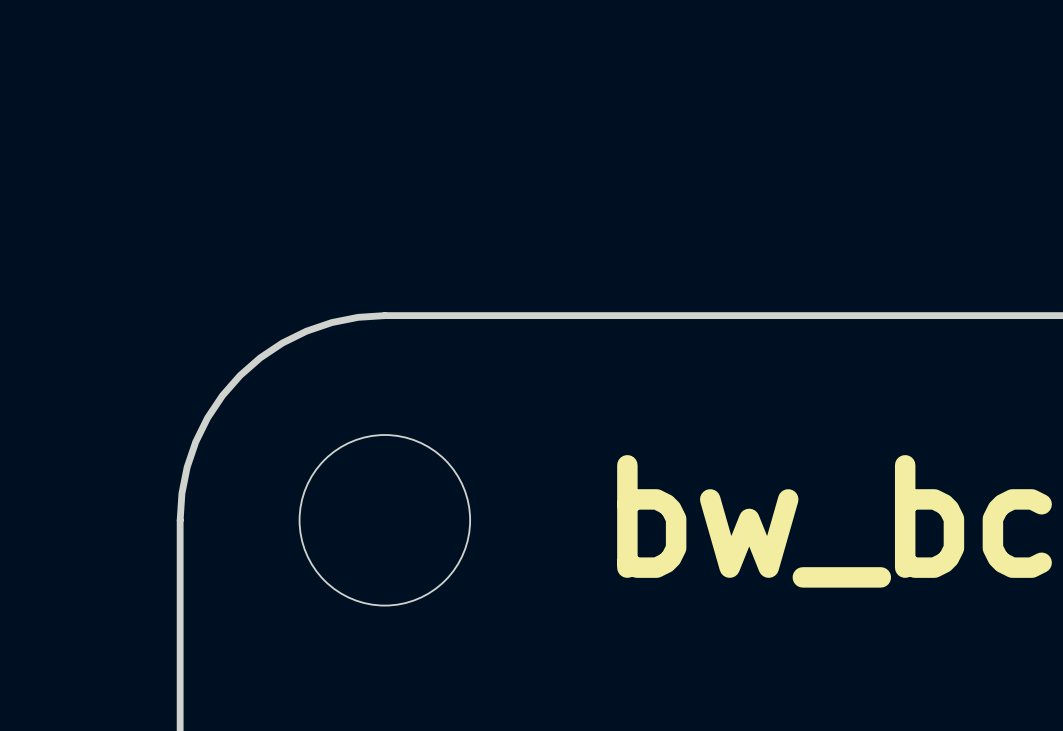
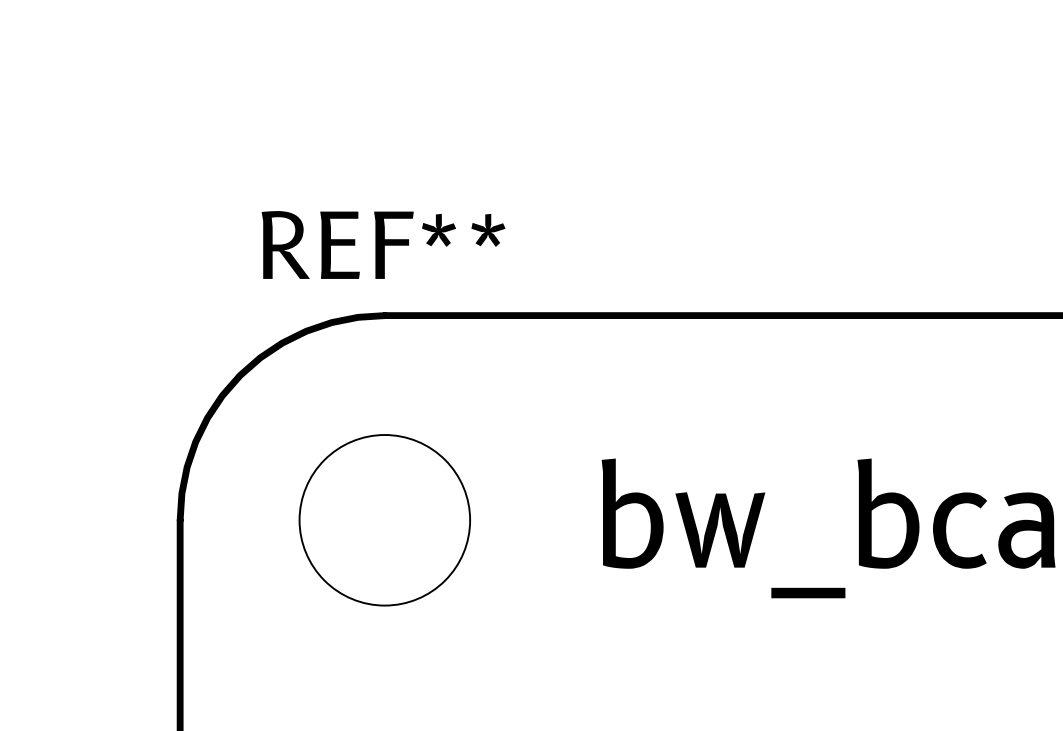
REF** name: none -> REF** (383, 245)

